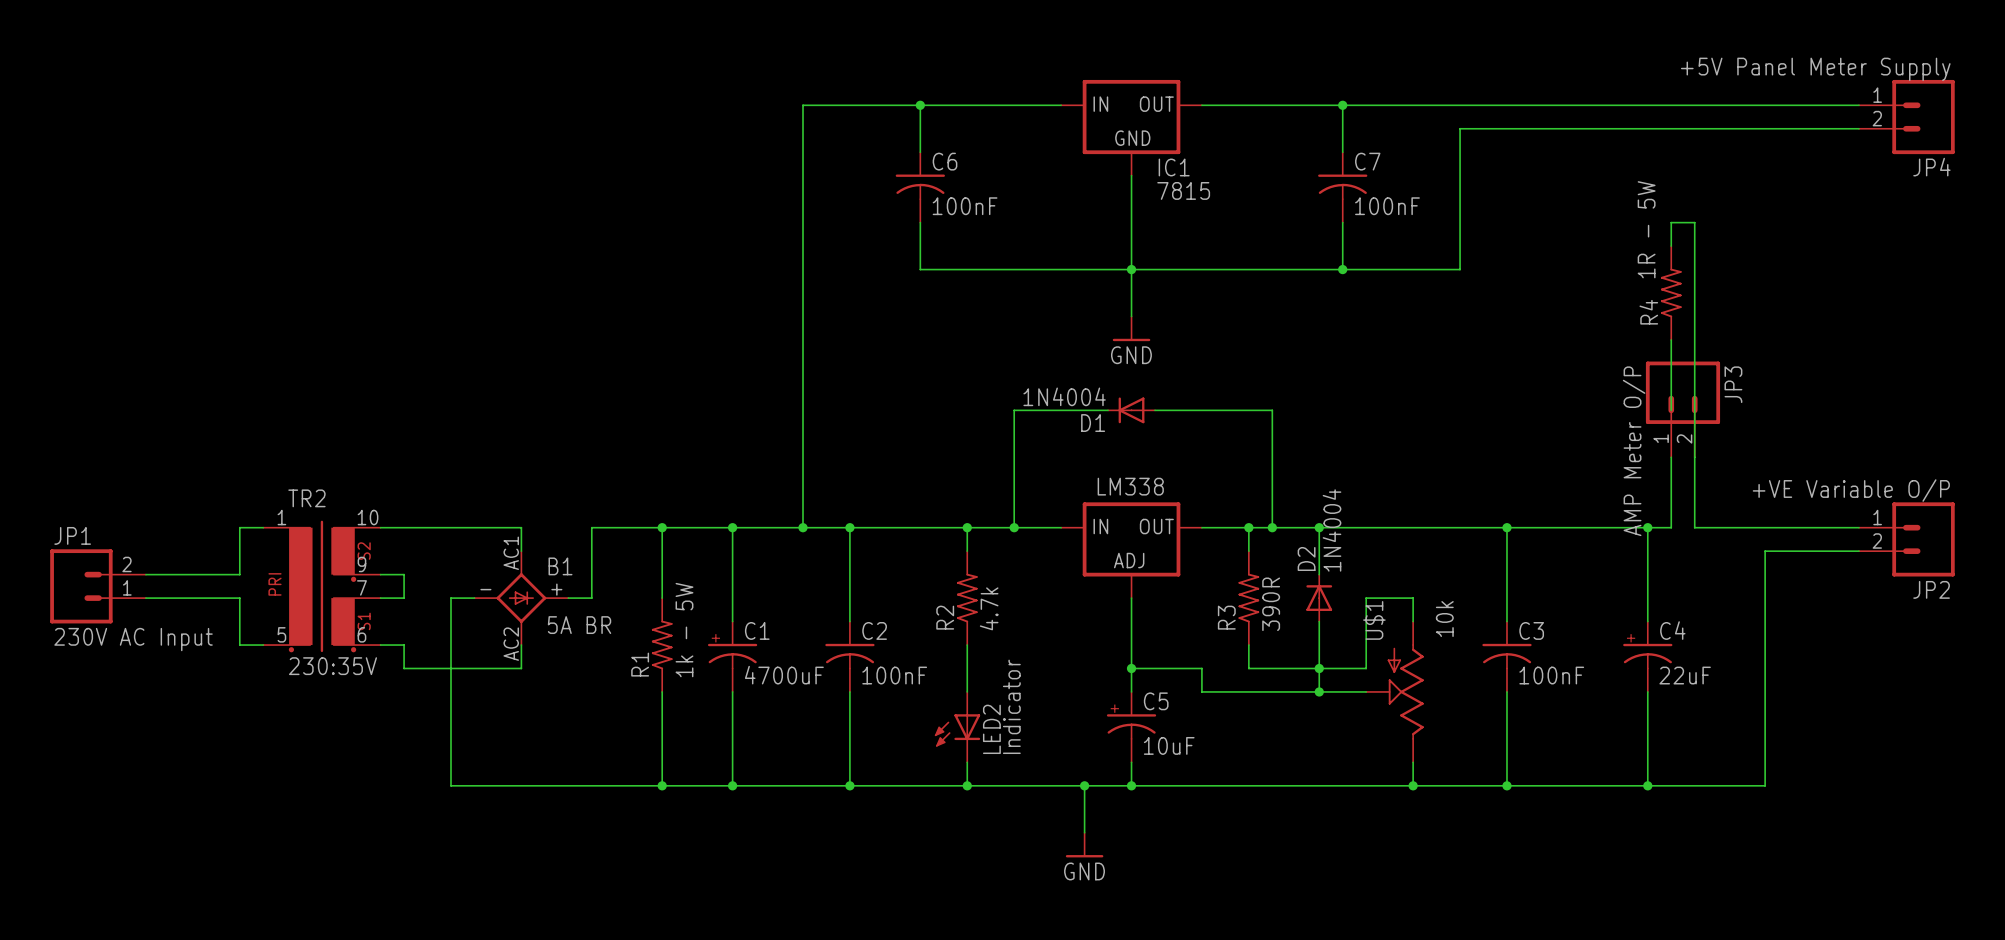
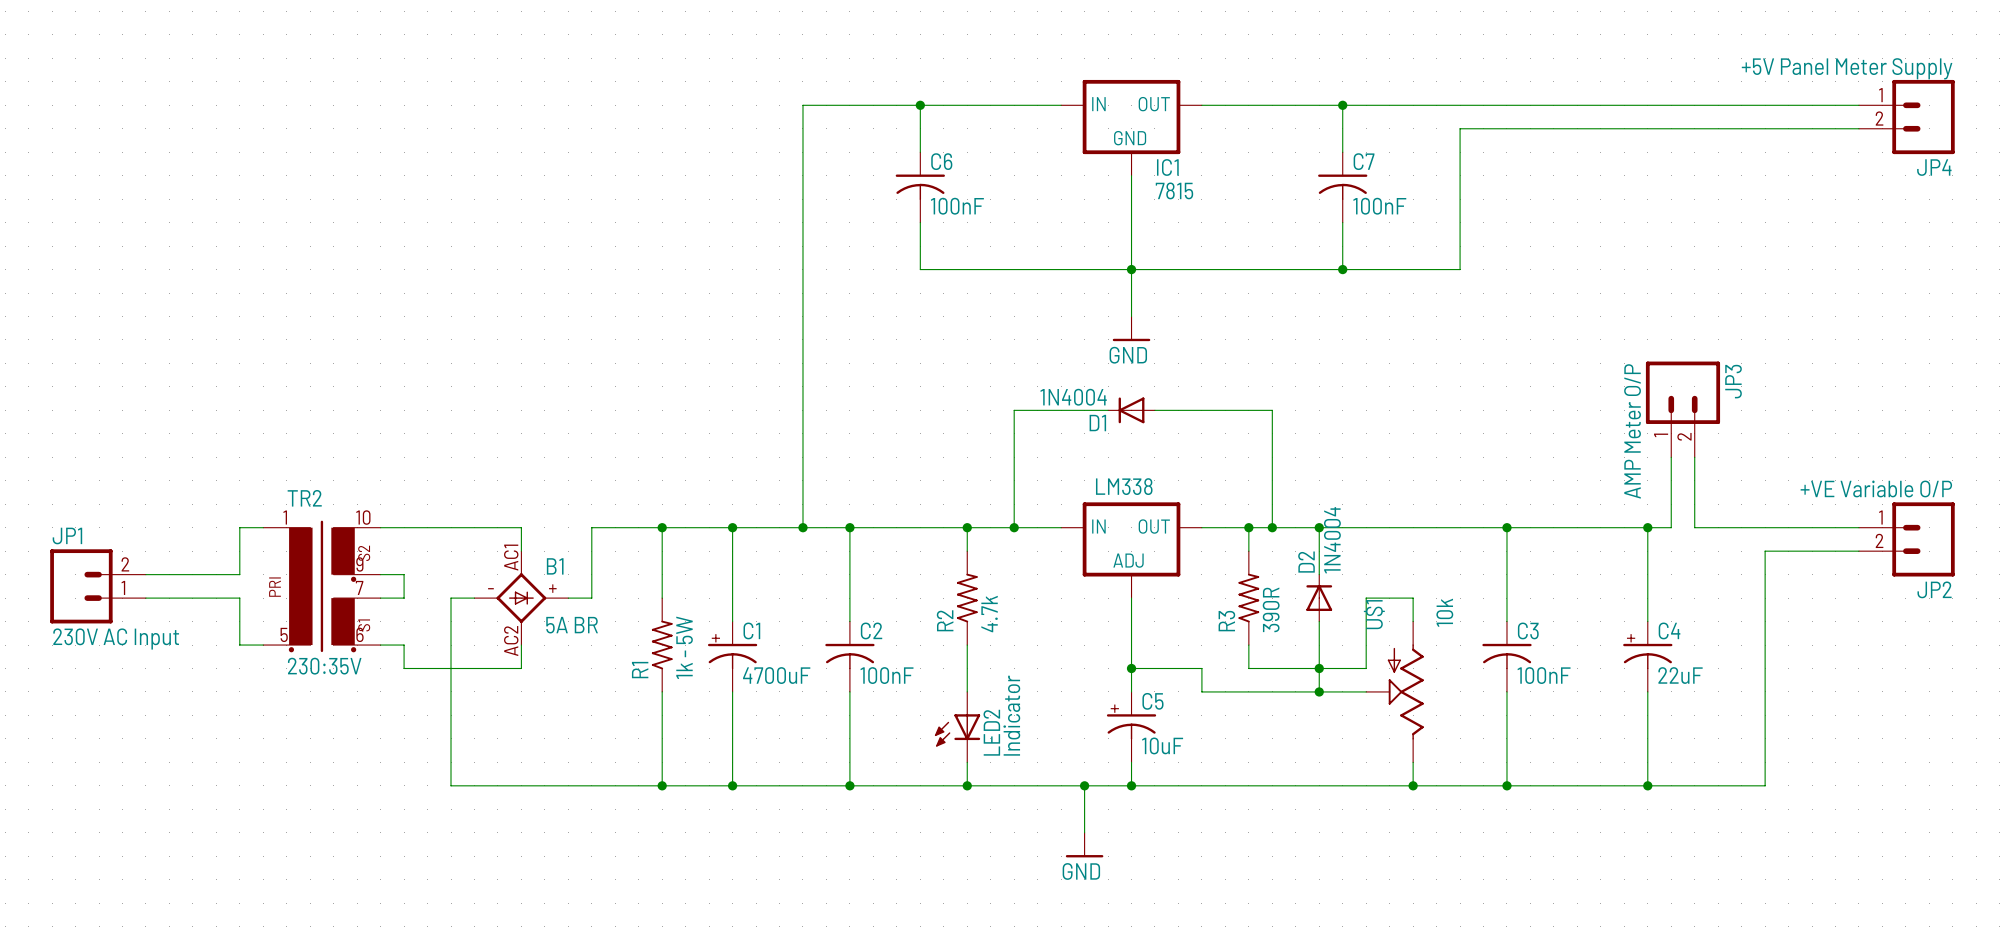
wire: (1671, 246) (1671, 222) (1694, 222) (1694, 457) -> none
R4: 1R - 5W (1671, 293) -> none
wire: (1671, 339) (1671, 410) -> none

